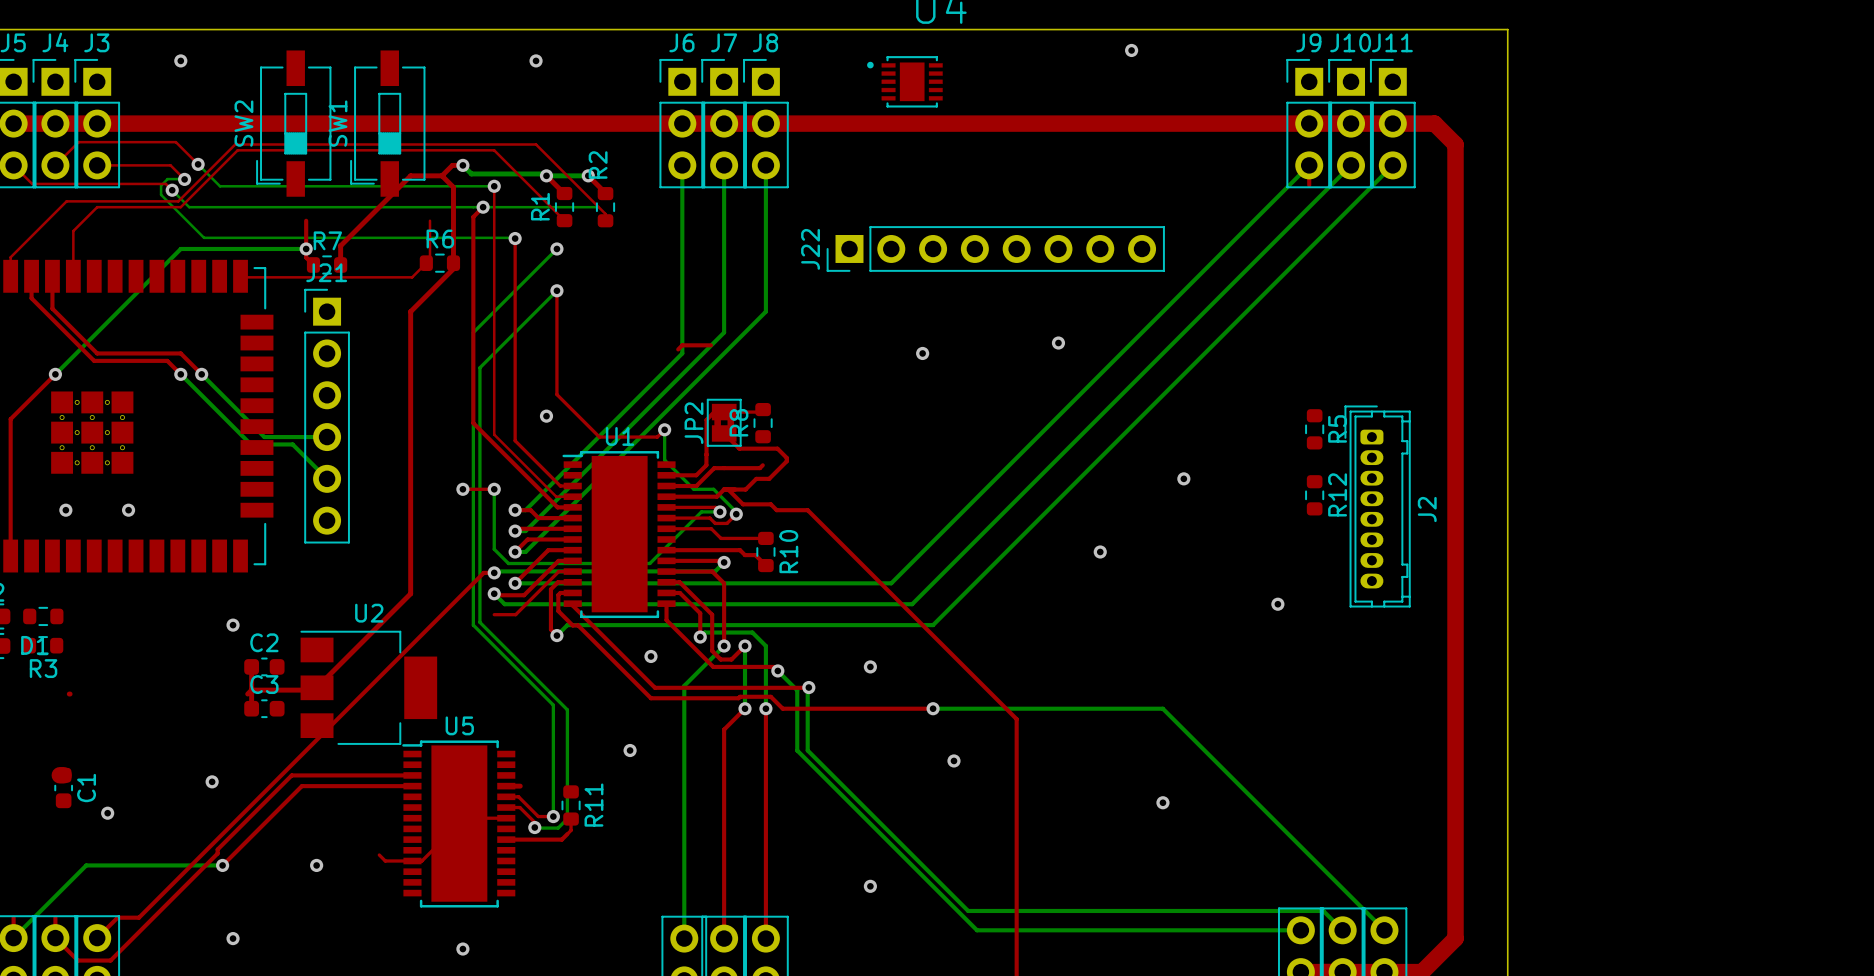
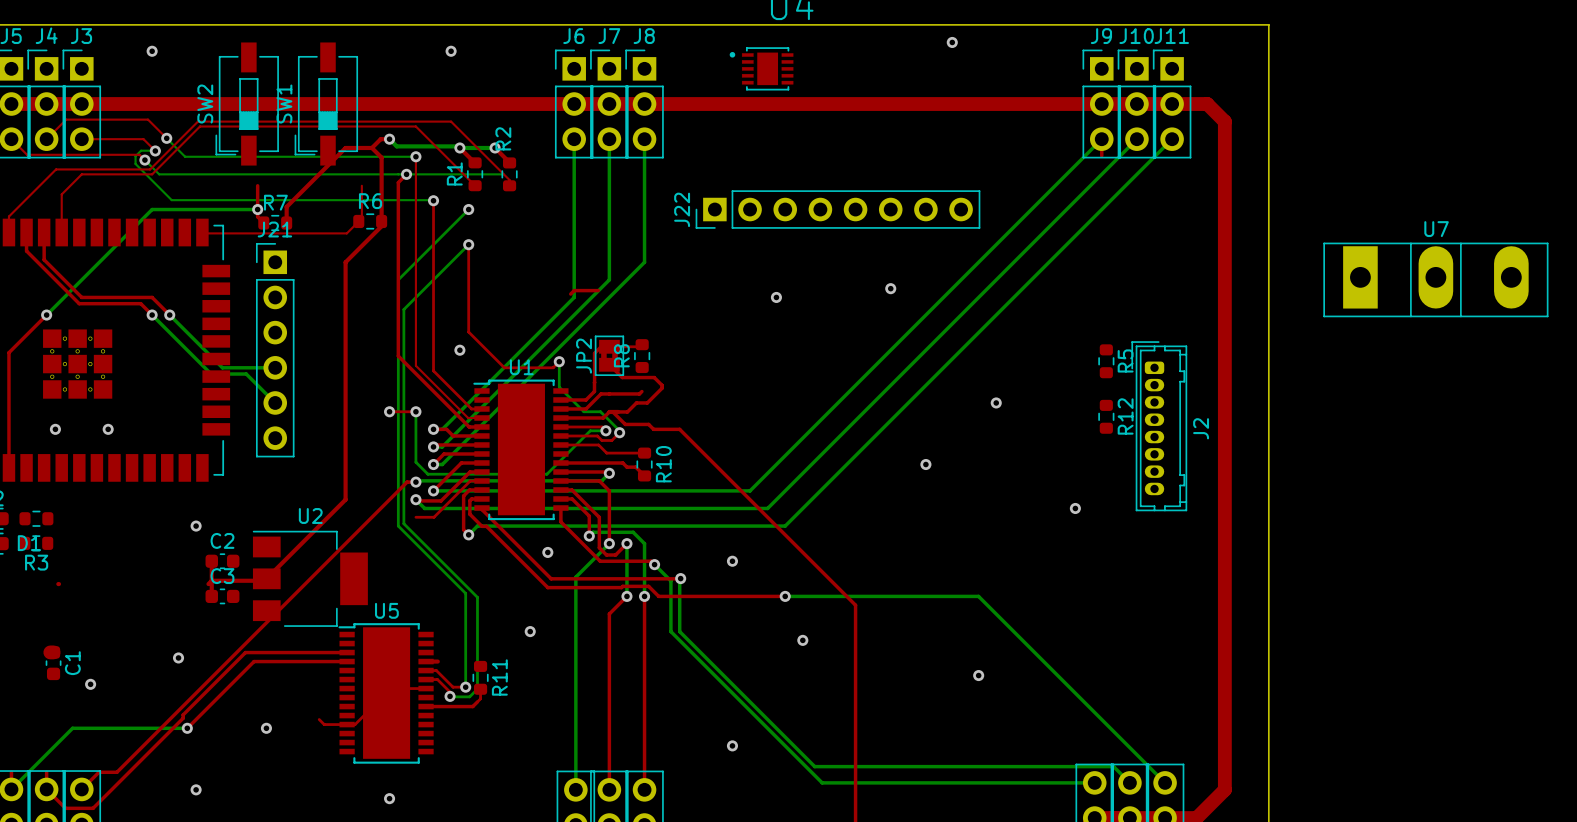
U7: none -> (1435, 279)

